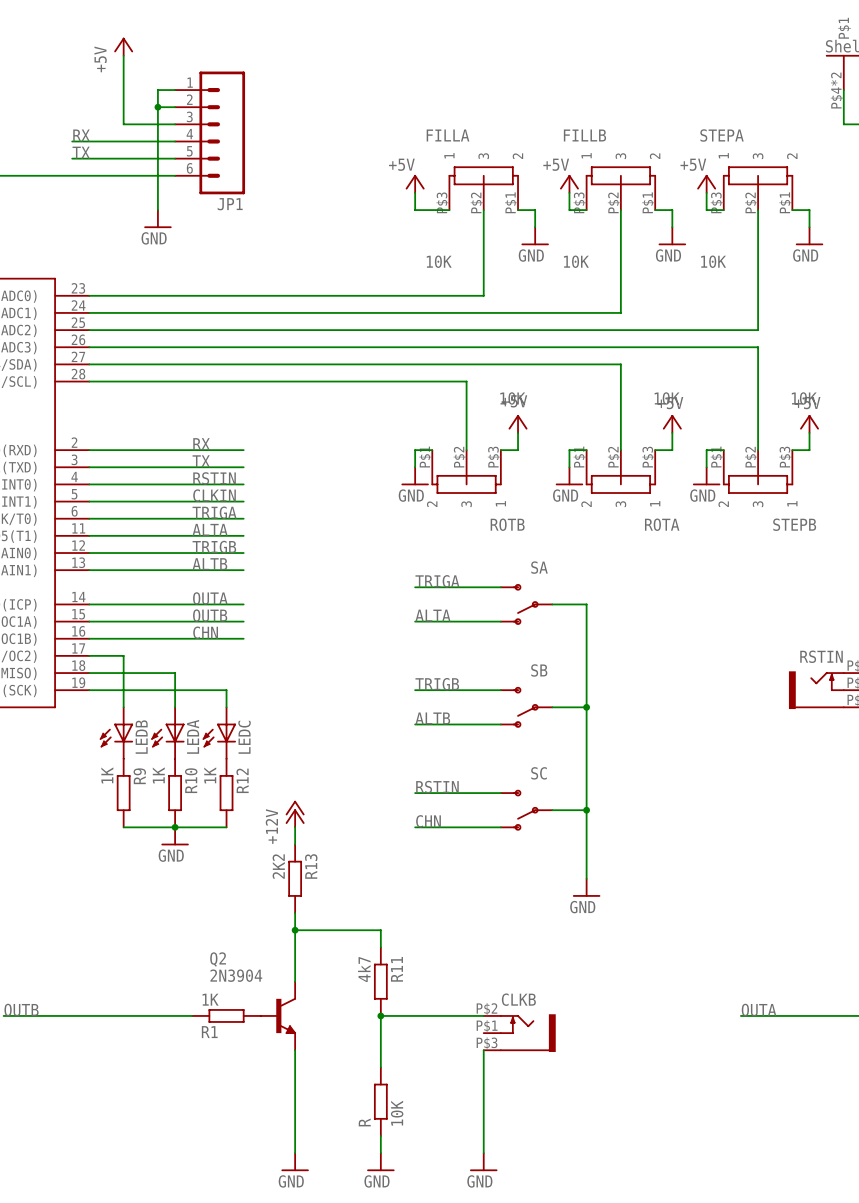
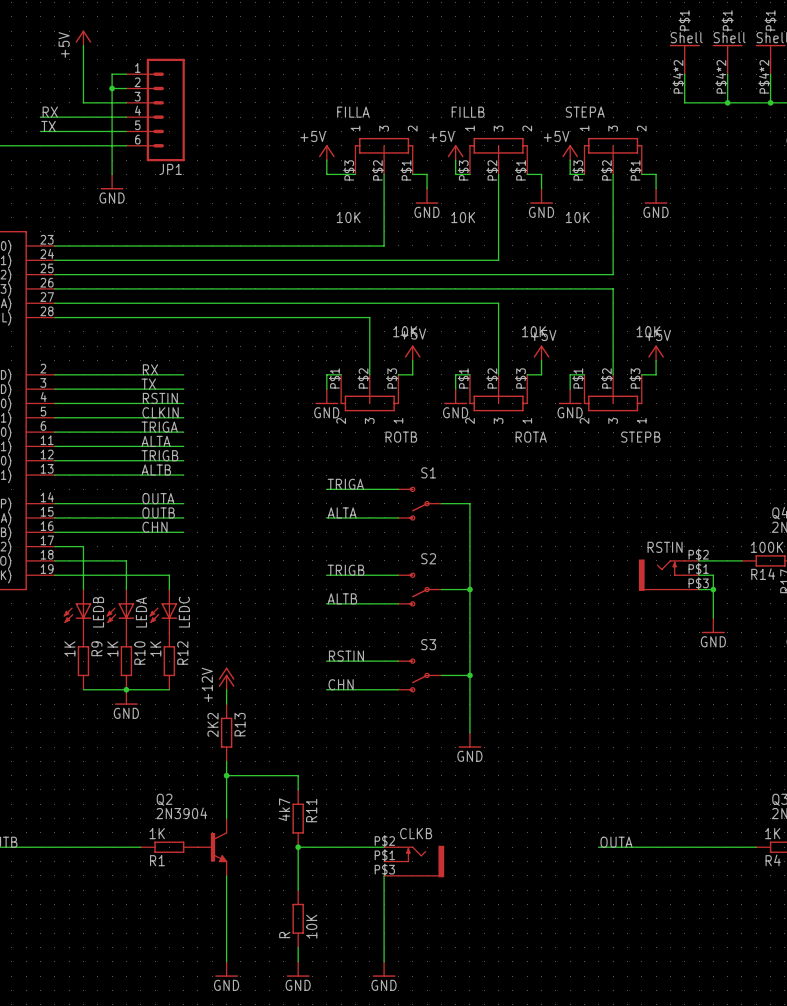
SA name: SA (539, 567) -> S1 (428, 472)
SB name: SB (539, 670) -> S2 (428, 558)
SC name: SC (539, 773) -> S3 (428, 644)

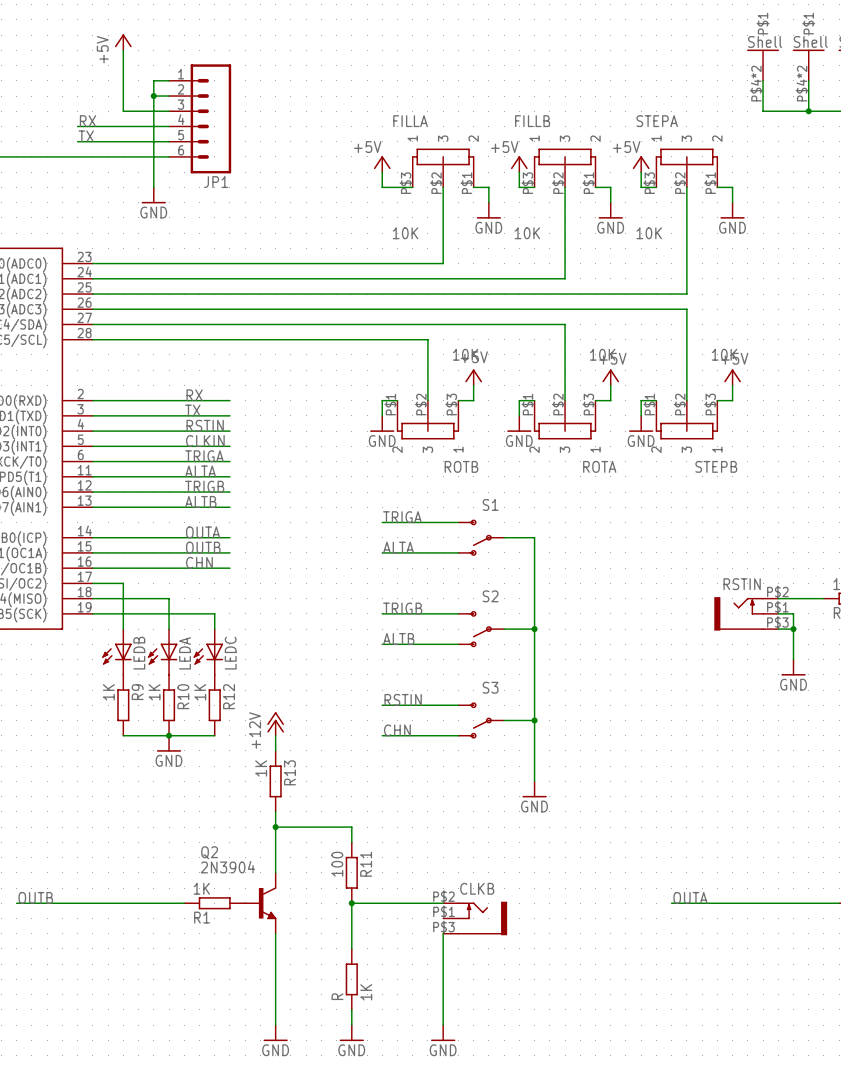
R13 value: 2K2 (213, 725) -> 1K (261, 768)
R11 value: 4k7 (284, 809) -> 100 (337, 864)
R value: 10K (311, 926) -> 1K (366, 992)

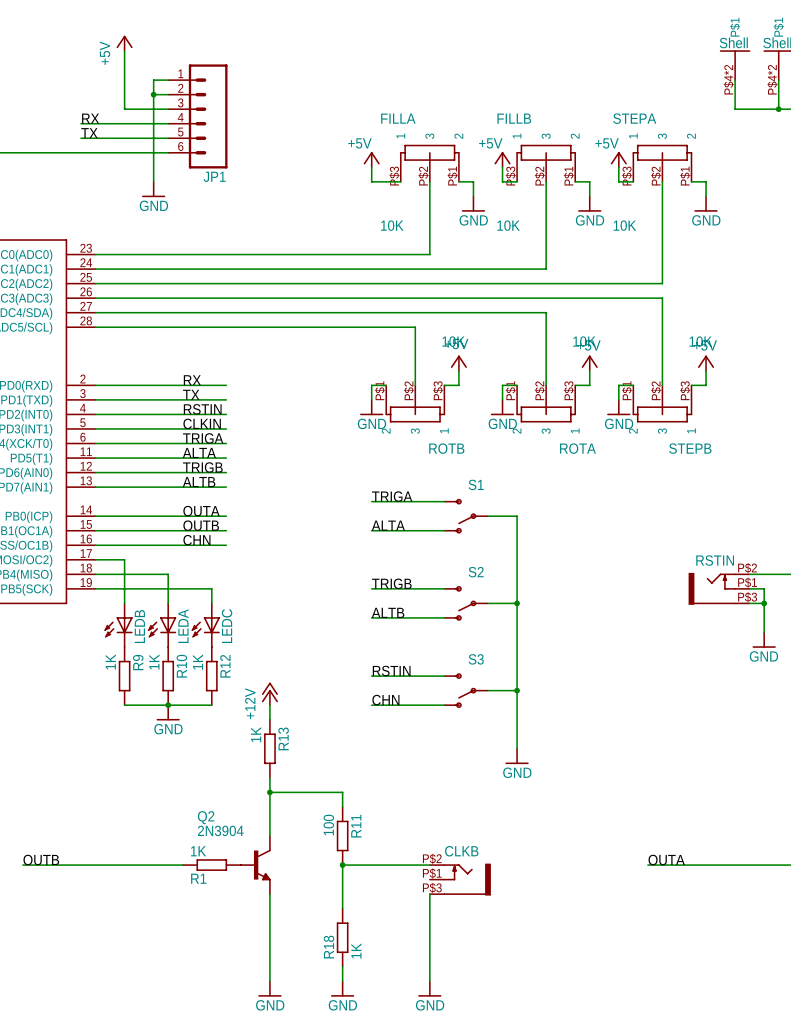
R name: R (337, 996) -> R18 (328, 947)

